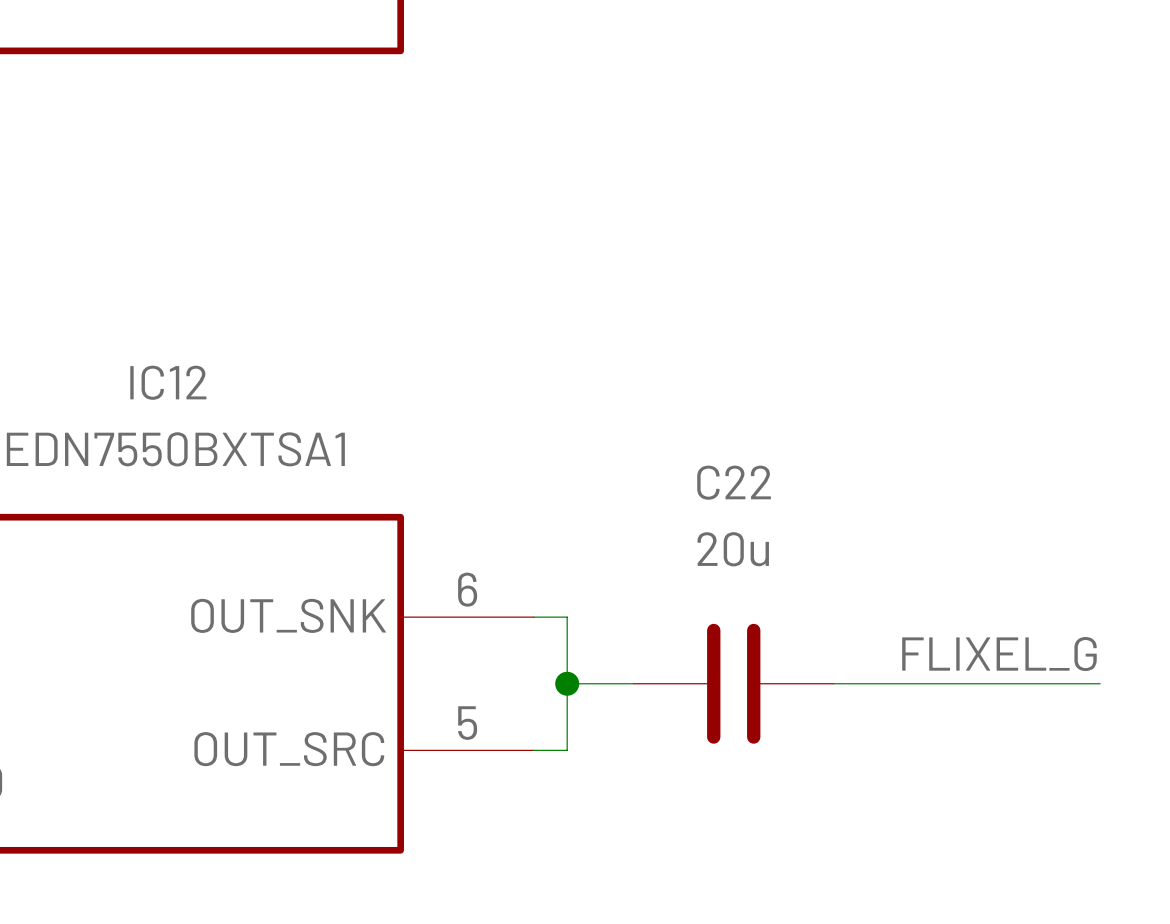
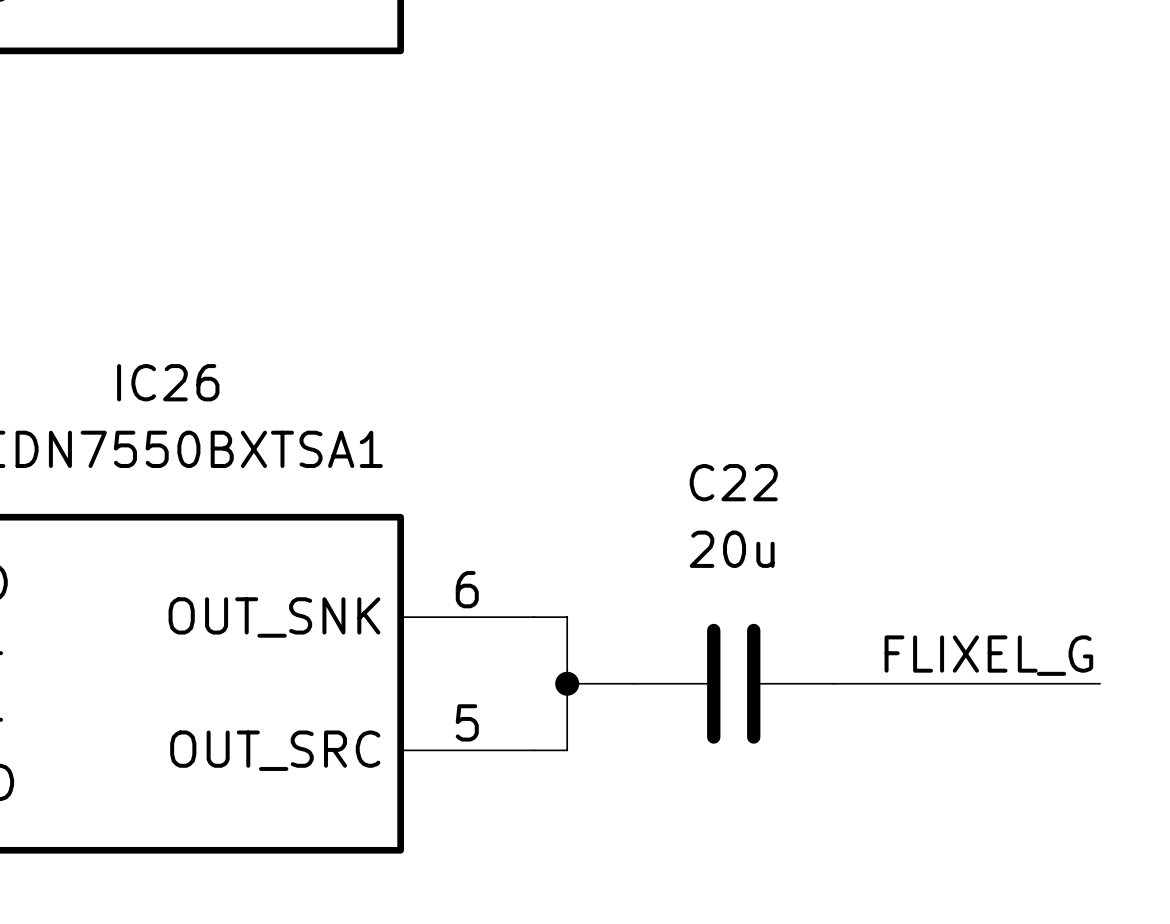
IC12 name: IC12 (168, 382) -> IC26 (168, 382)

